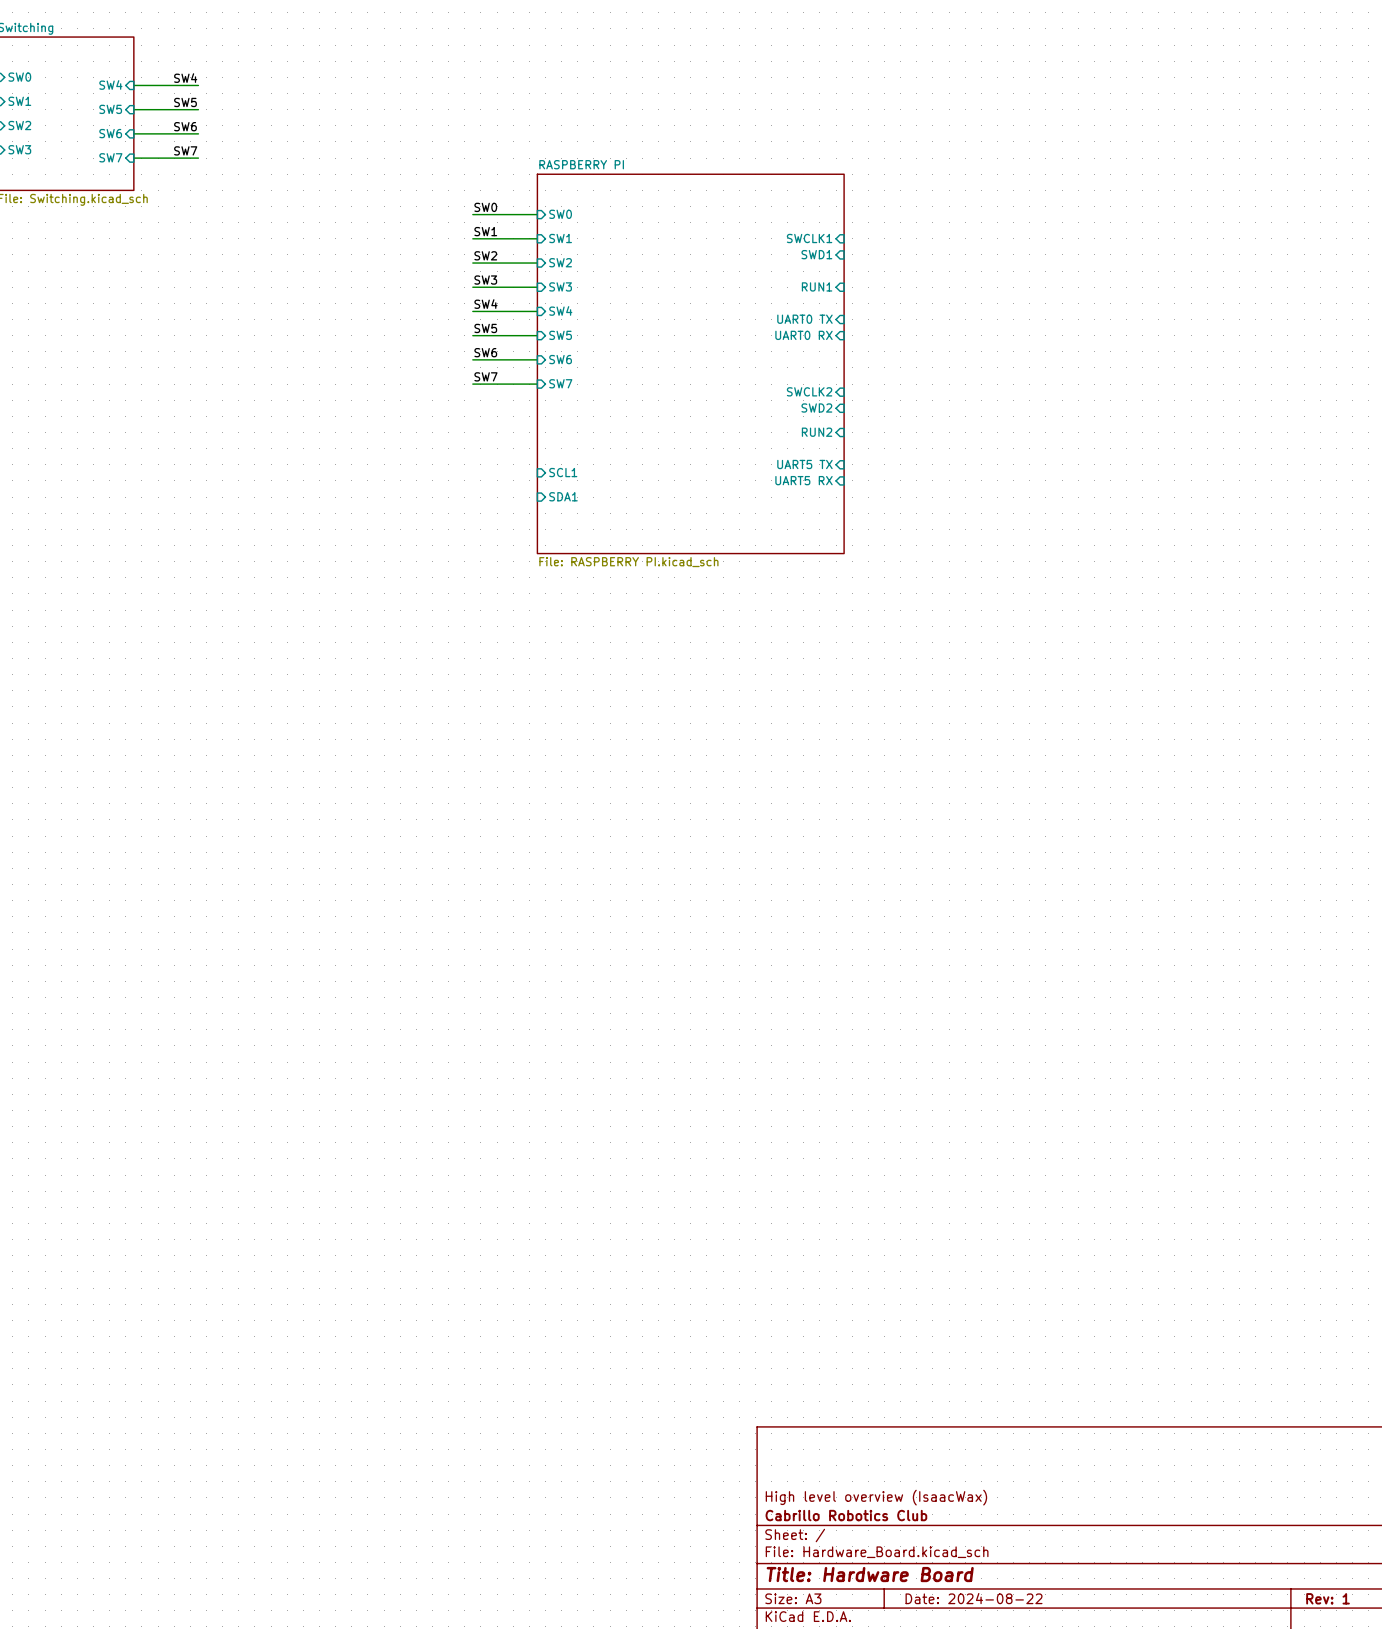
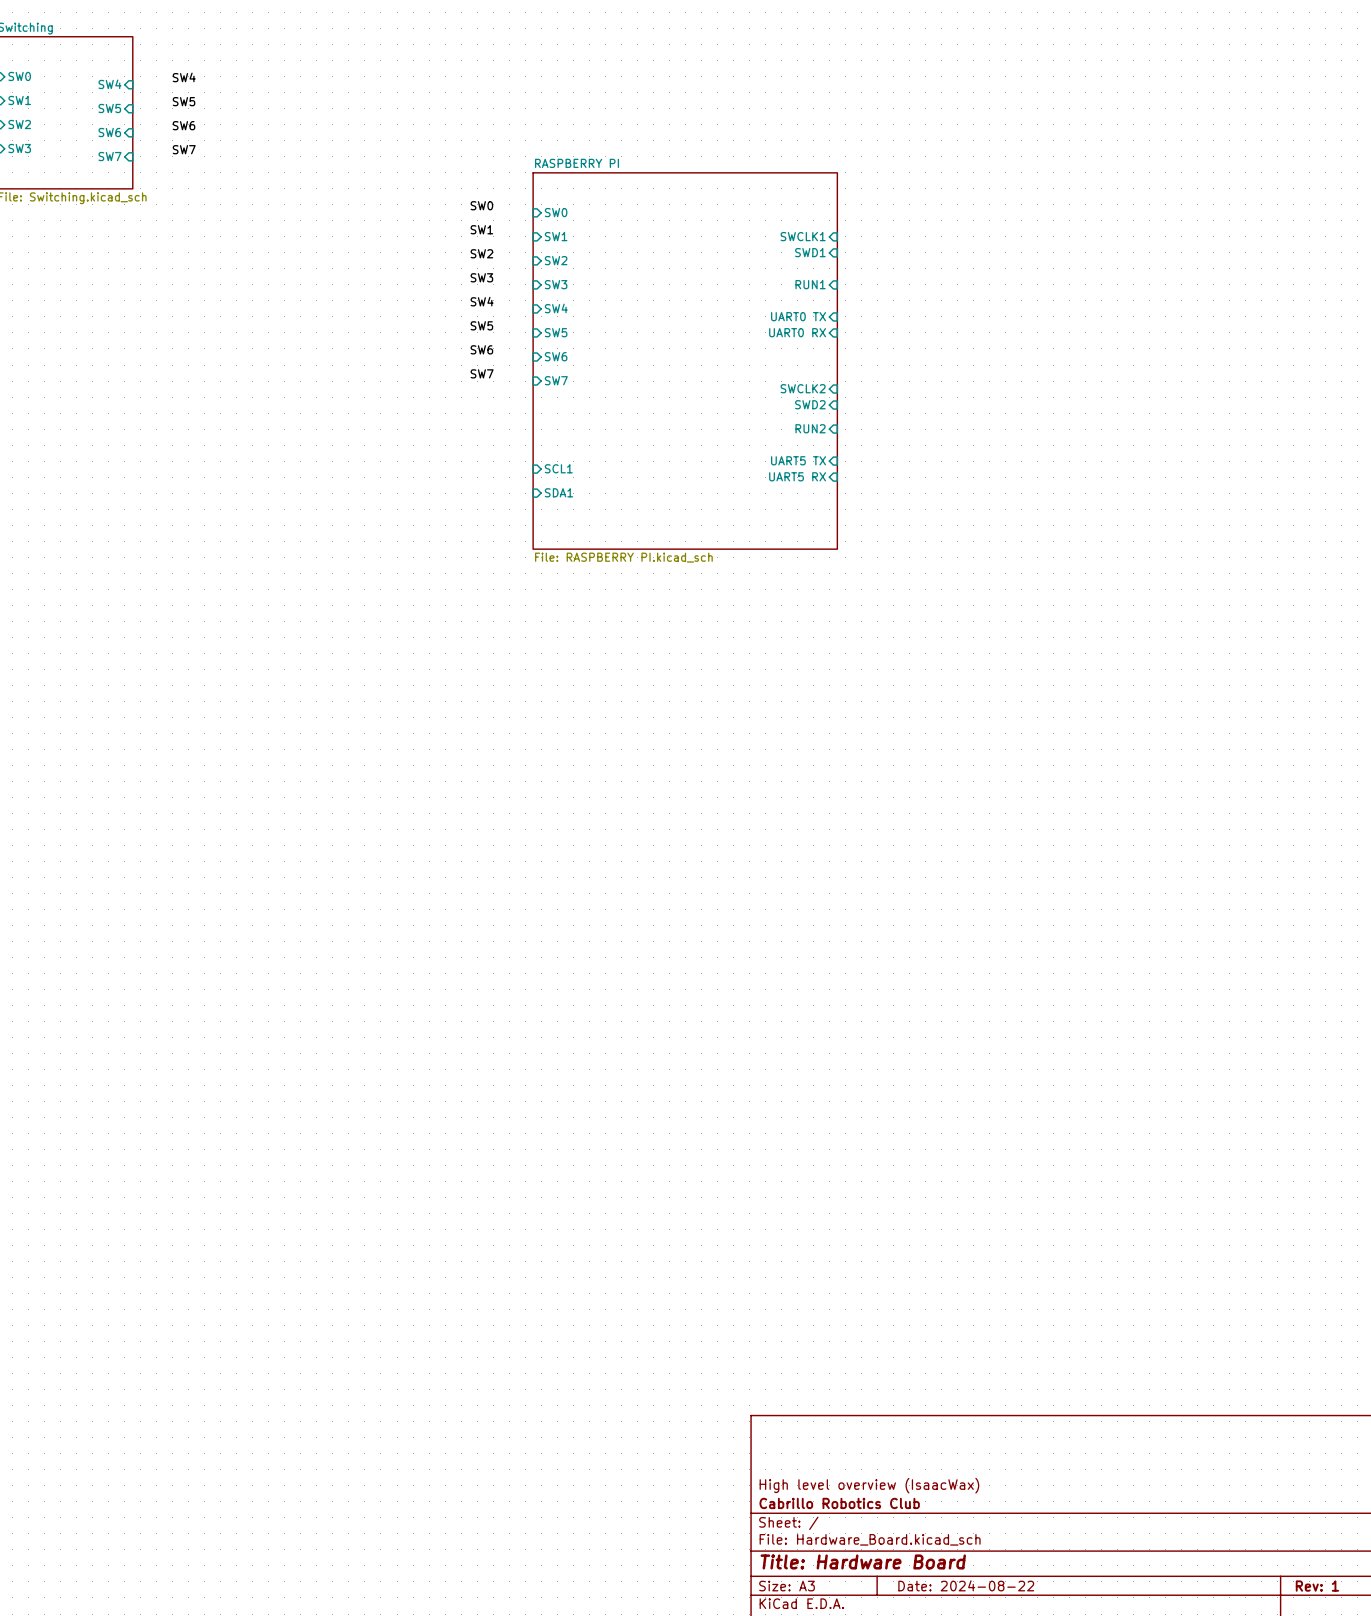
wire: (133, 85) (198, 85) -> none
wire: (133, 109) (198, 109) -> none
wire: (133, 133) (198, 133) -> none
wire: (133, 158) (198, 158) -> none
wire: (472, 214) (537, 214) -> none
wire: (472, 238) (537, 238) -> none
wire: (472, 263) (537, 263) -> none
wire: (472, 287) (537, 287) -> none
wire: (472, 311) (537, 311) -> none
wire: (472, 335) (537, 335) -> none
wire: (472, 359) (537, 359) -> none
wire: (472, 384) (537, 384) -> none

